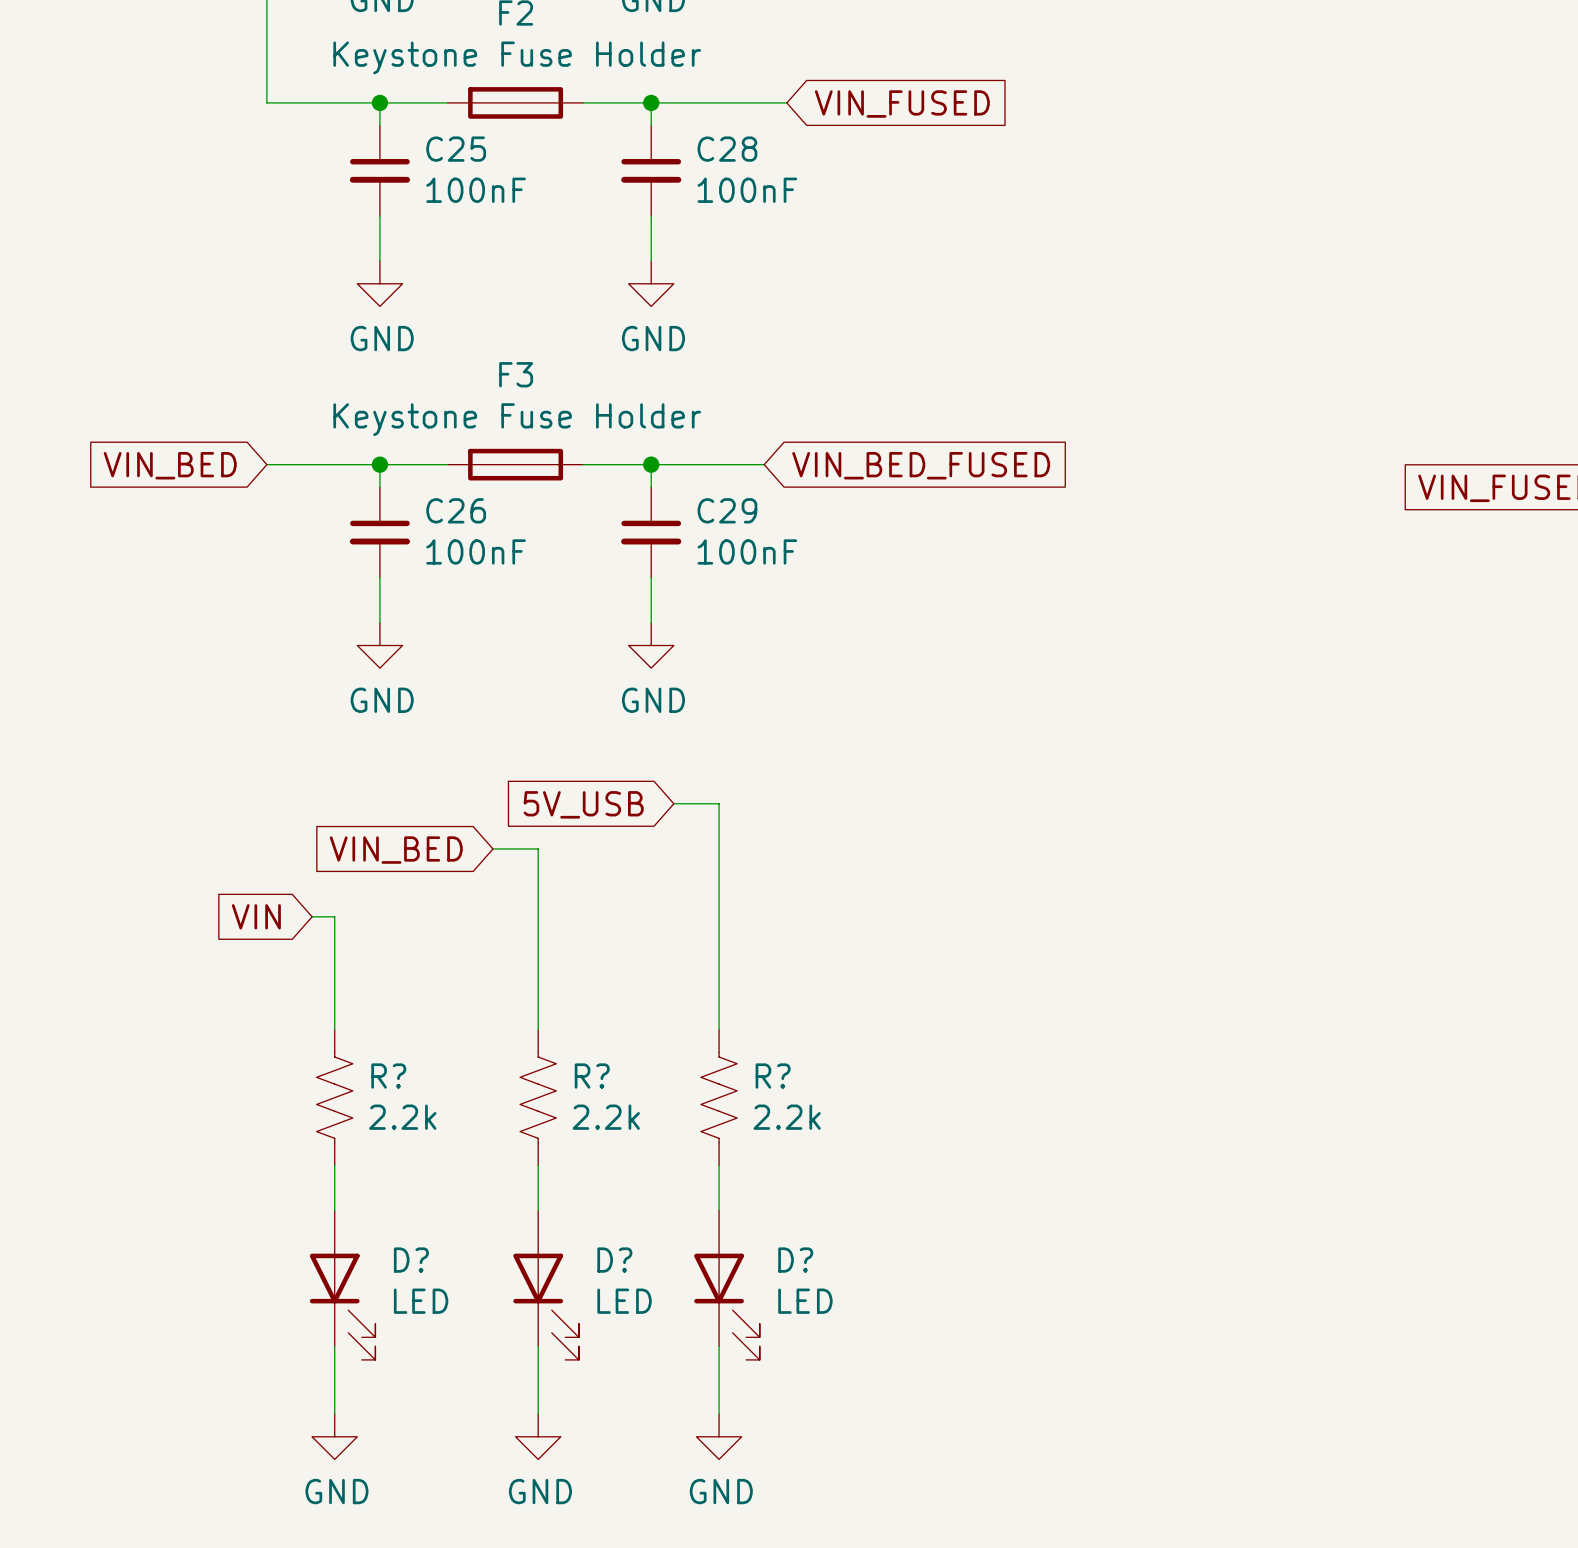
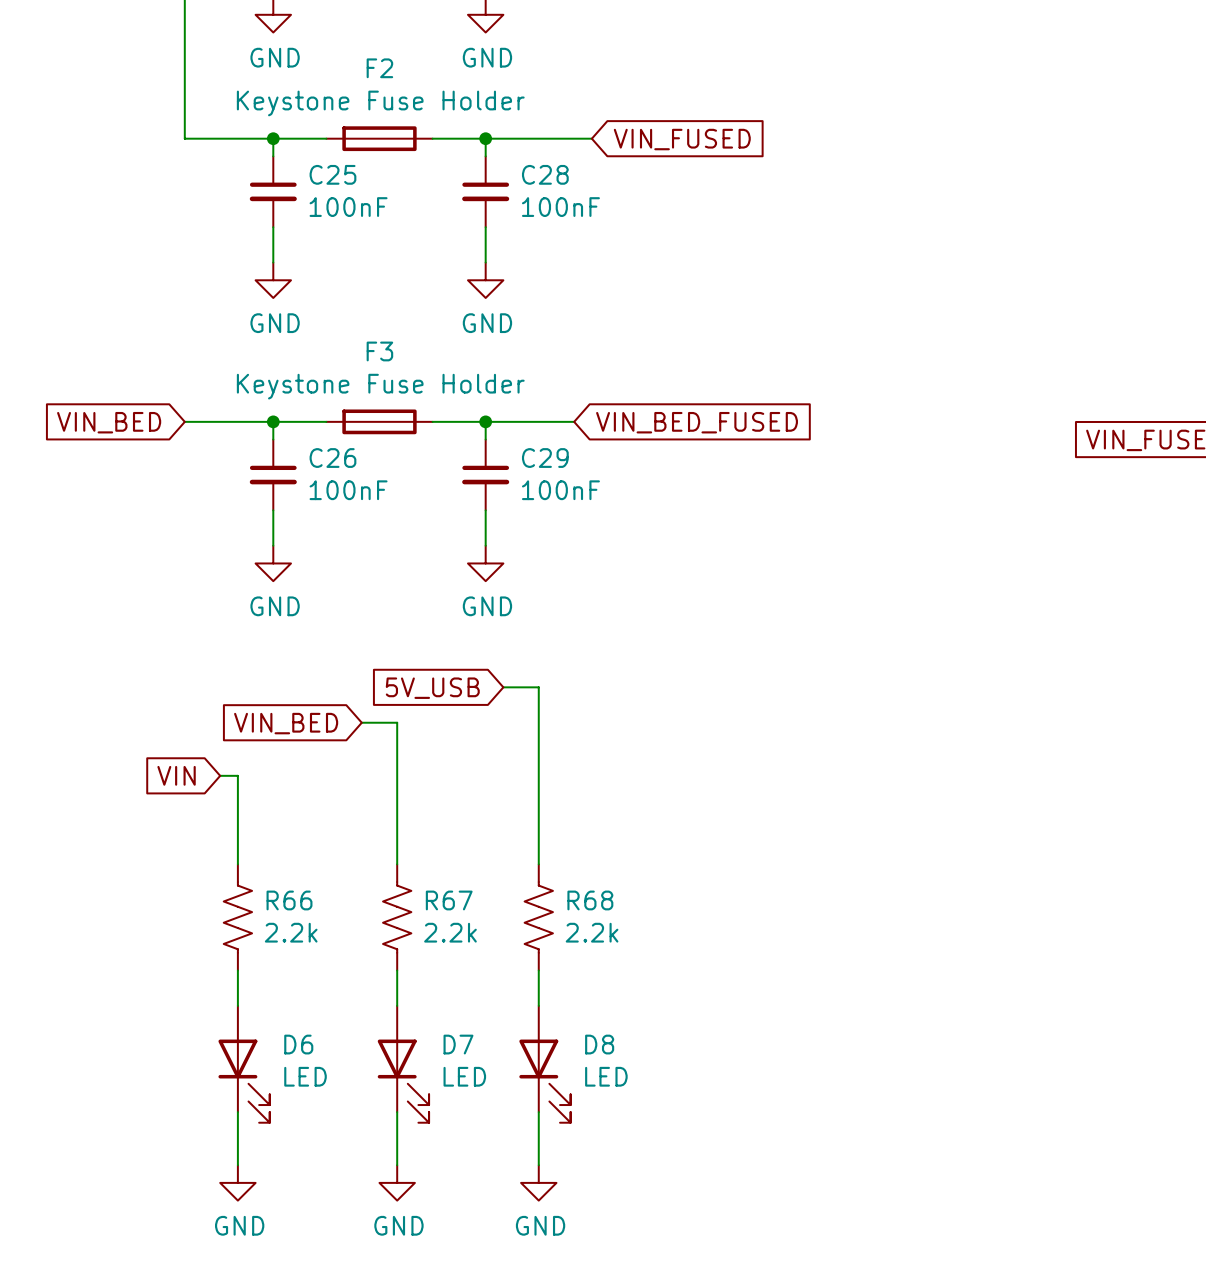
R? name: R? (388, 1076) -> R66 (289, 900)
R? name: R? (592, 1076) -> R67 (449, 900)
R? name: R? (773, 1076) -> R68 (590, 900)
D? name: D? (411, 1260) -> D6 (298, 1044)
D? name: D? (614, 1260) -> D7 (458, 1044)
D? name: D? (795, 1260) -> D8 (599, 1044)

